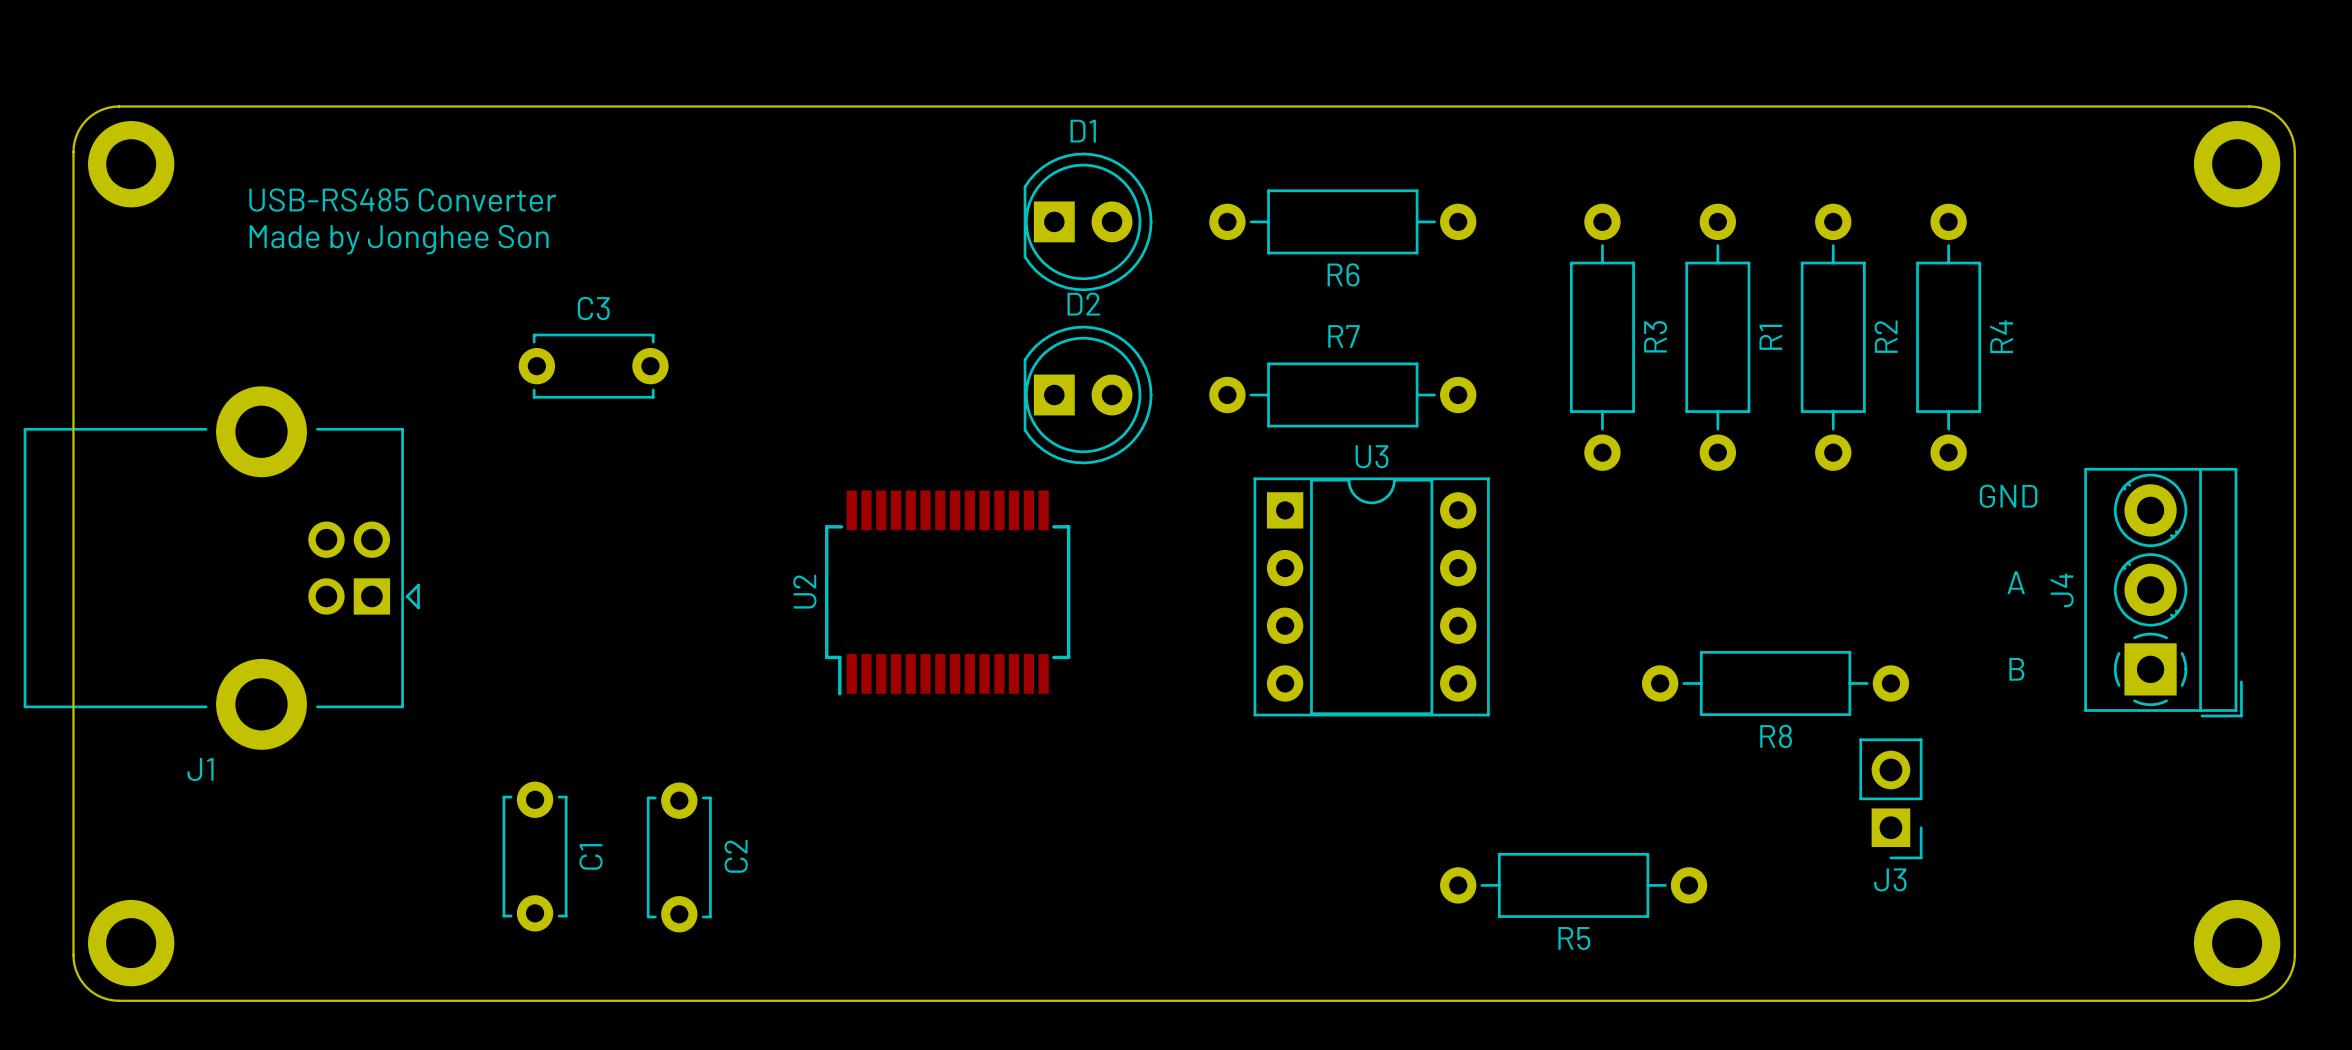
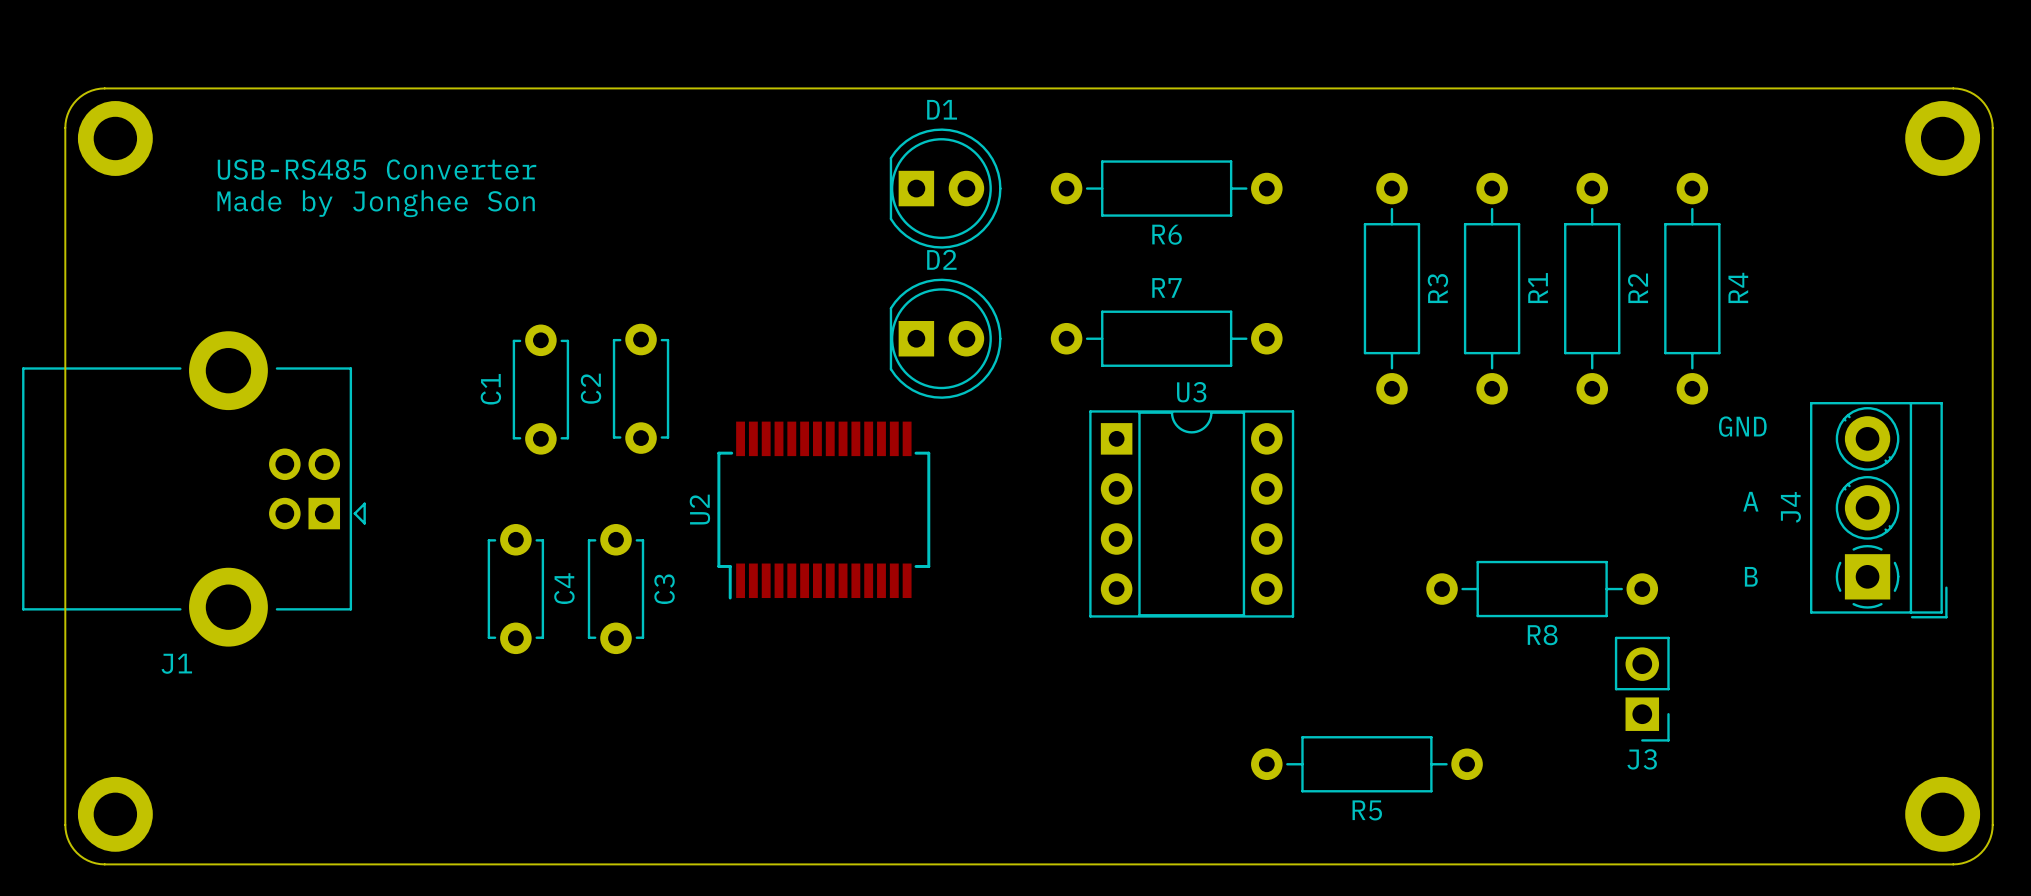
C3 name position: C3 (593, 308) -> C3 (664, 589)
C3 footprint: [518, 333, 669, 399] -> [587, 524, 645, 655]
C4: none -> (515, 589)
C1 footprint: [502, 781, 568, 932] -> [512, 324, 570, 455]
C2 footprint: [646, 782, 712, 933] -> [612, 323, 670, 454]
C1 name position: C1 (591, 856) -> C1 (490, 389)
C2 name position: C2 (736, 856) -> C2 (591, 388)

